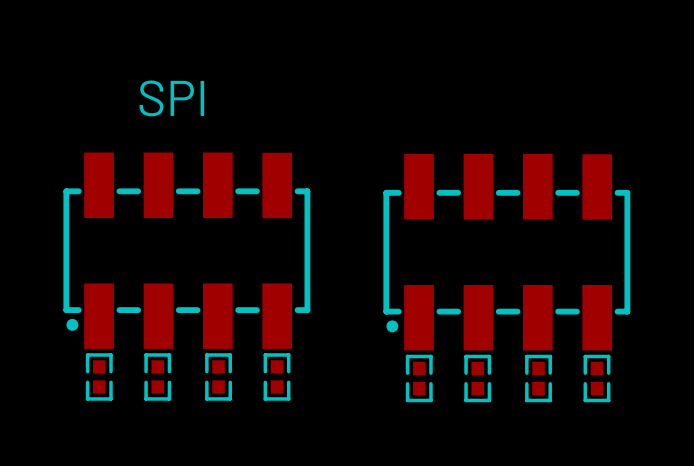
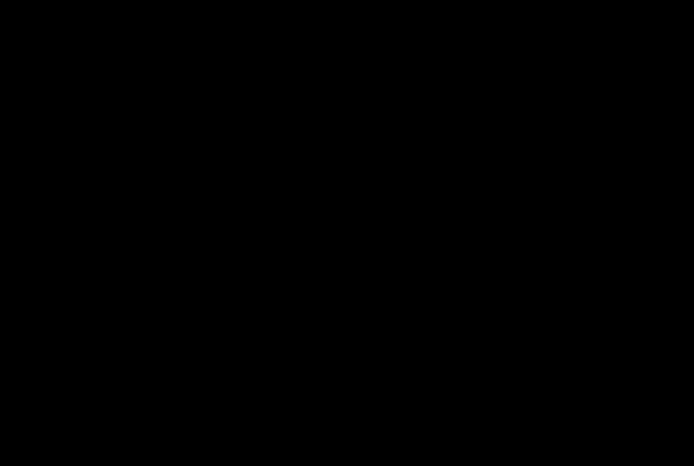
text: SPI (171, 98) -> none
part: (186, 250) -> none
part: (506, 252) -> none
part: (99, 376) -> none
part: (157, 376) -> none
part: (218, 376) -> none
part: (276, 376) -> none
part: (419, 378) -> none
part: (477, 378) -> none
part: (538, 378) -> none
part: (596, 378) -> none

